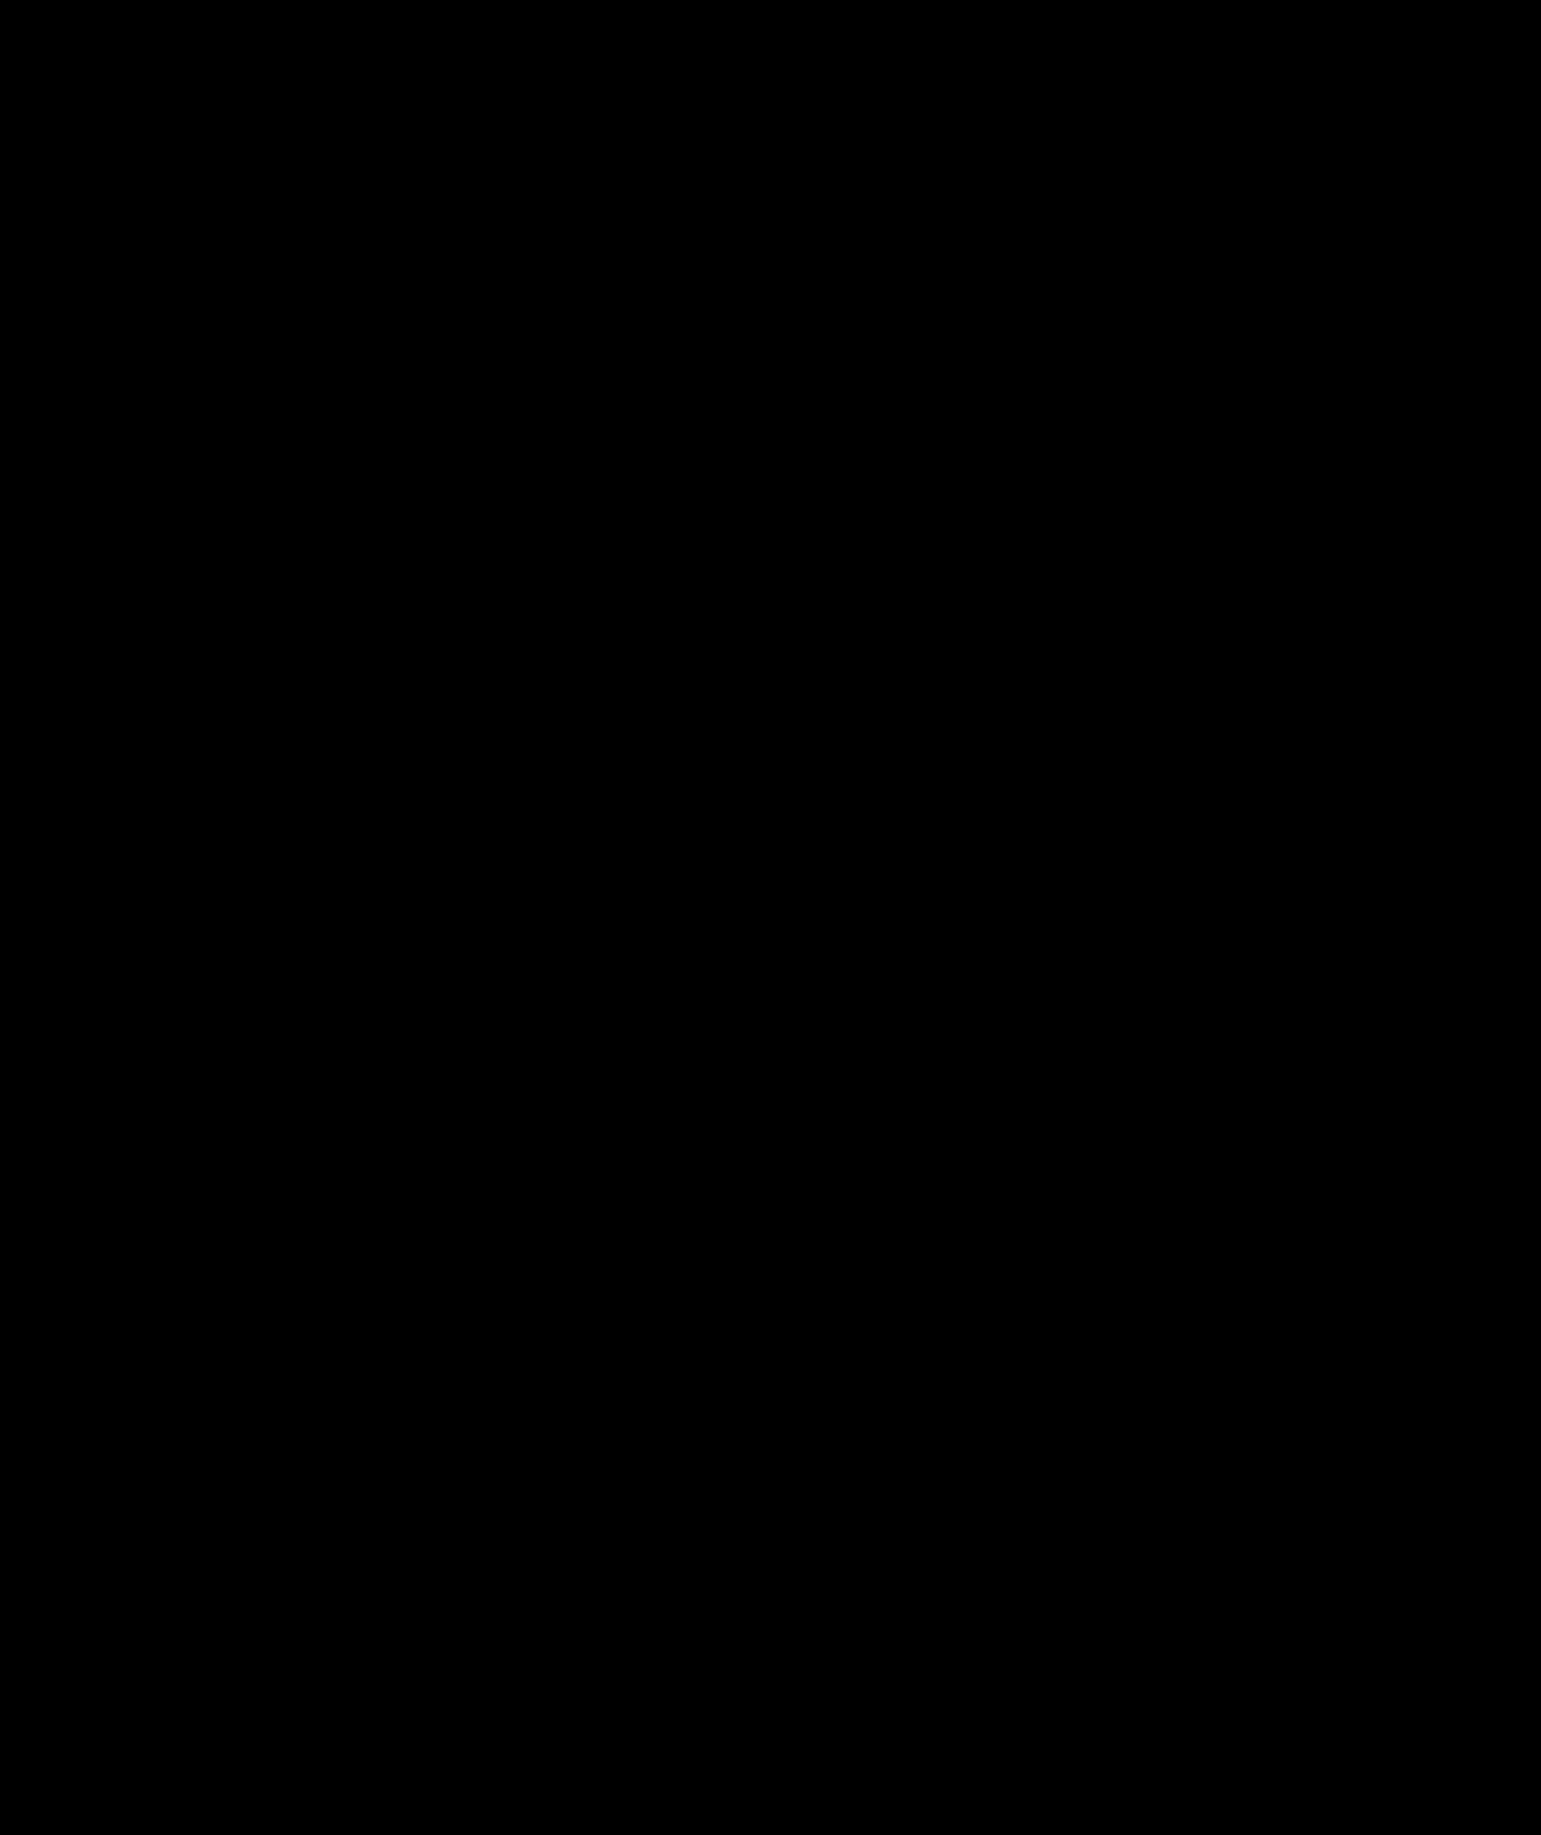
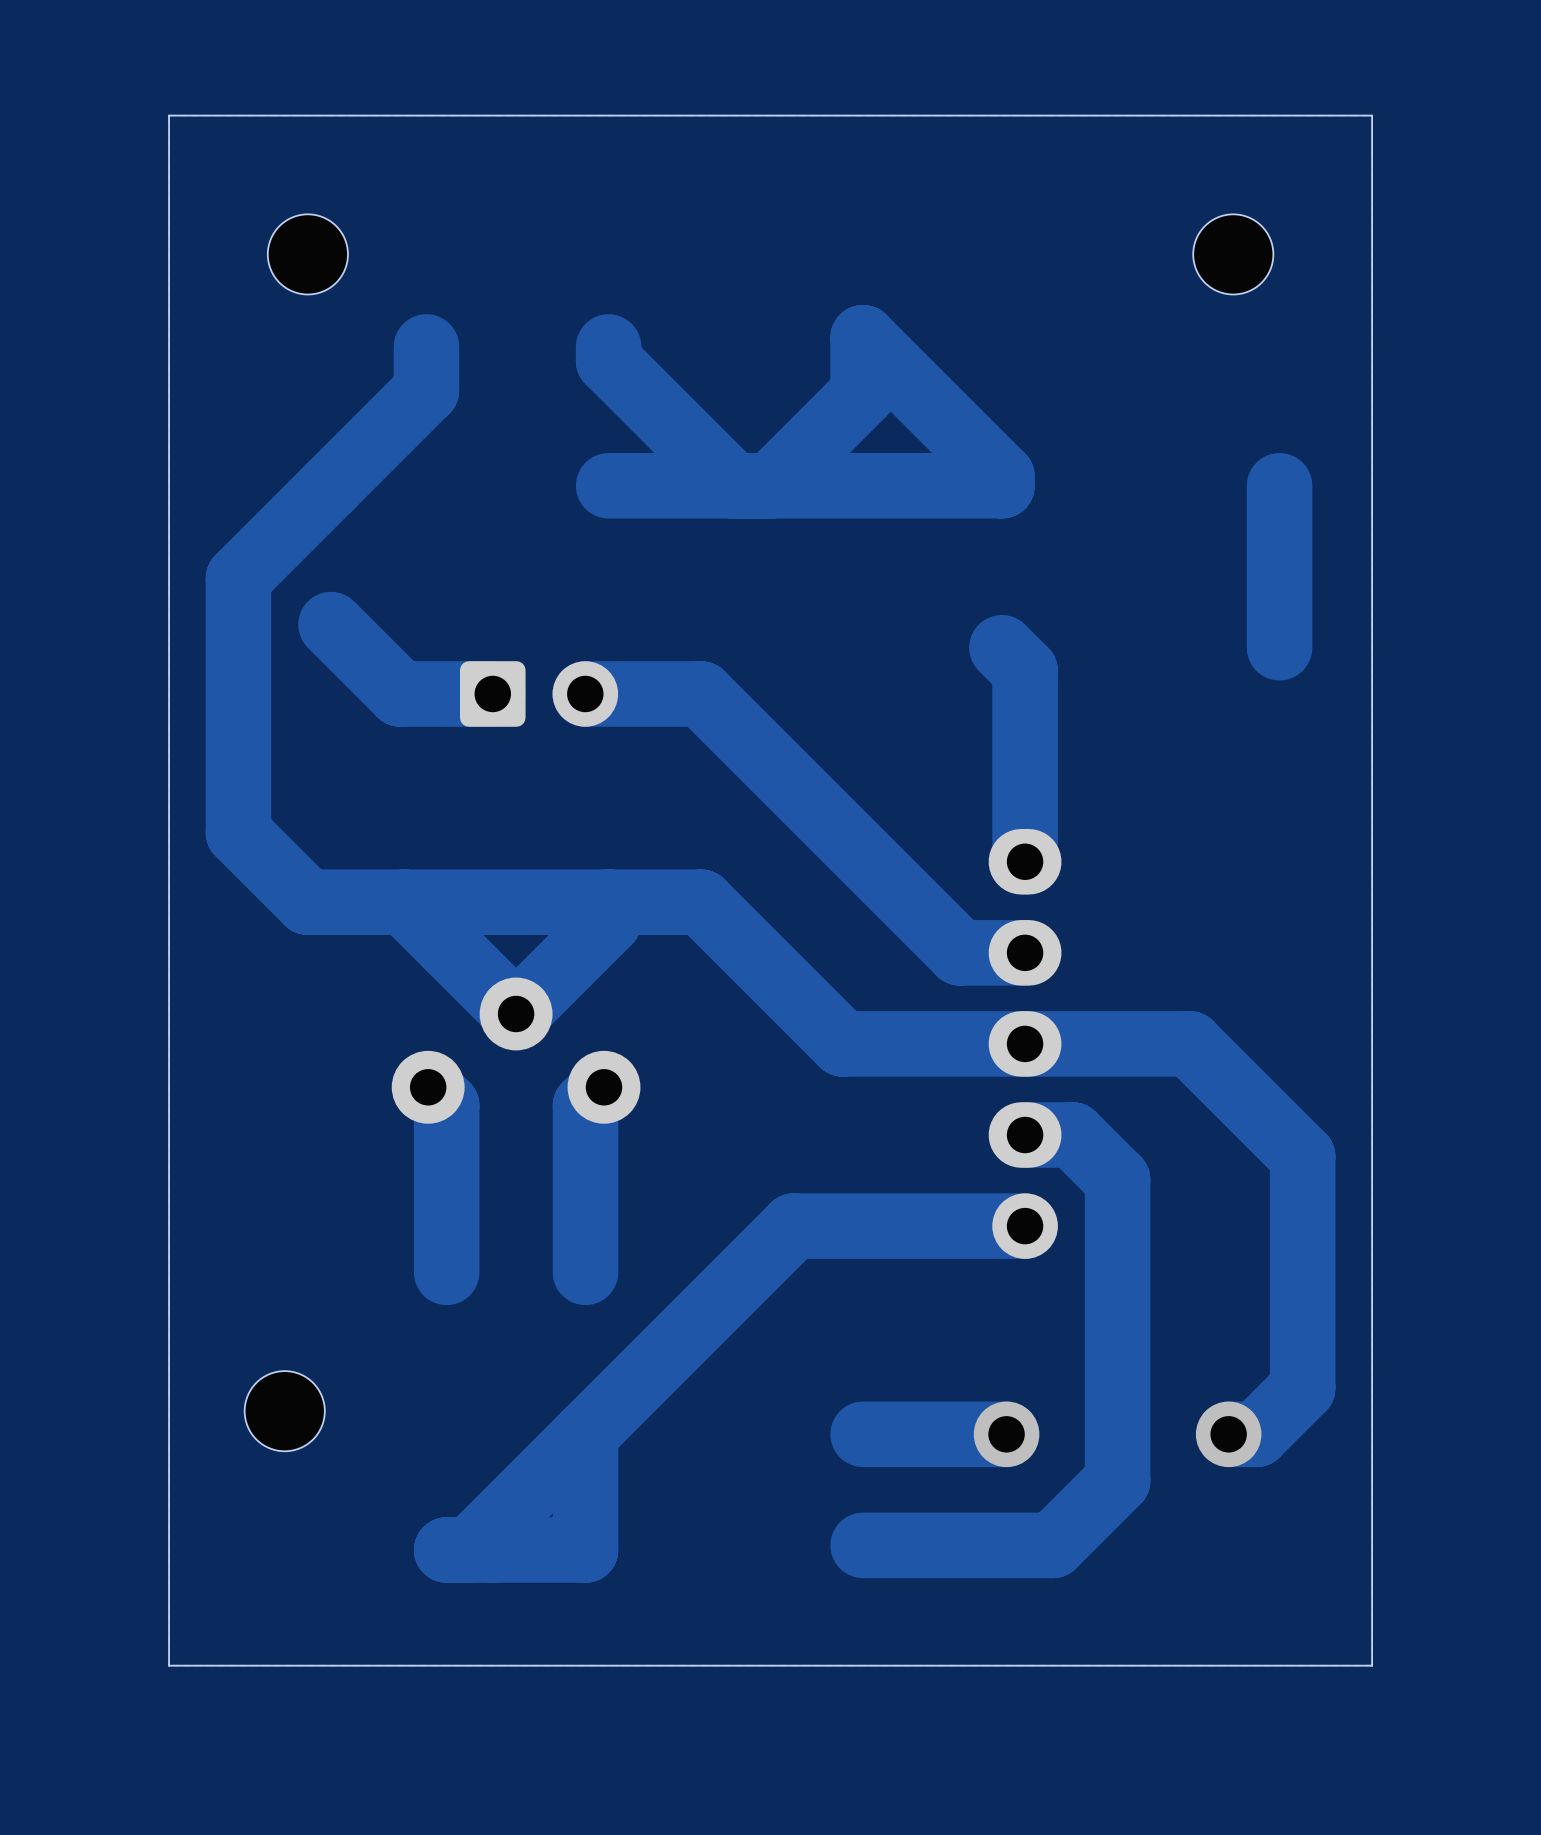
board edge: none -> (1372, 115) (1372, 1665) (169, 1665) (169, 115) (1372, 115)
part: none -> (307, 254)
part: none -> (1233, 254)
track: none -> (426, 346) (426, 390) (238, 578) (238, 832) (307, 902) (701, 902) (842, 1043) (1189, 1043) (1302, 1156) (1302, 1388) (1256, 1434) (1233, 1434)
track: none -> (608, 346) (608, 360) (733, 485)
track: none -> (770, 485) (863, 393) (863, 337) (1001, 476) (1001, 485) (608, 485)
track: none -> (1279, 485) (1279, 647)
track: none -> (331, 624) (400, 693) (492, 693)
track: none -> (1001, 647) (1025, 670) (1025, 861)
part: none -> (539, 693)
track: none -> (585, 693) (701, 693) (960, 952) (1025, 952)
track: none -> (608, 902) (608, 921) (516, 1014) (404, 902)
part: none -> (1025, 1043)
part: none -> (516, 1050)
track: none -> (428, 1087) (446, 1105) (446, 1272)
track: none -> (604, 1087) (585, 1105) (585, 1272)
track: none -> (1025, 1135) (1072, 1135) (1117, 1179) (1117, 1480) (1052, 1545) (863, 1545)
track: none -> (1025, 1226) (793, 1226) (469, 1549)
part: none -> (284, 1411)
track: none -> (585, 1434) (585, 1549) (446, 1549)
track: none -> (1006, 1434) (863, 1434)
via: none -> (1006, 1434)
via: none -> (1228, 1434)

